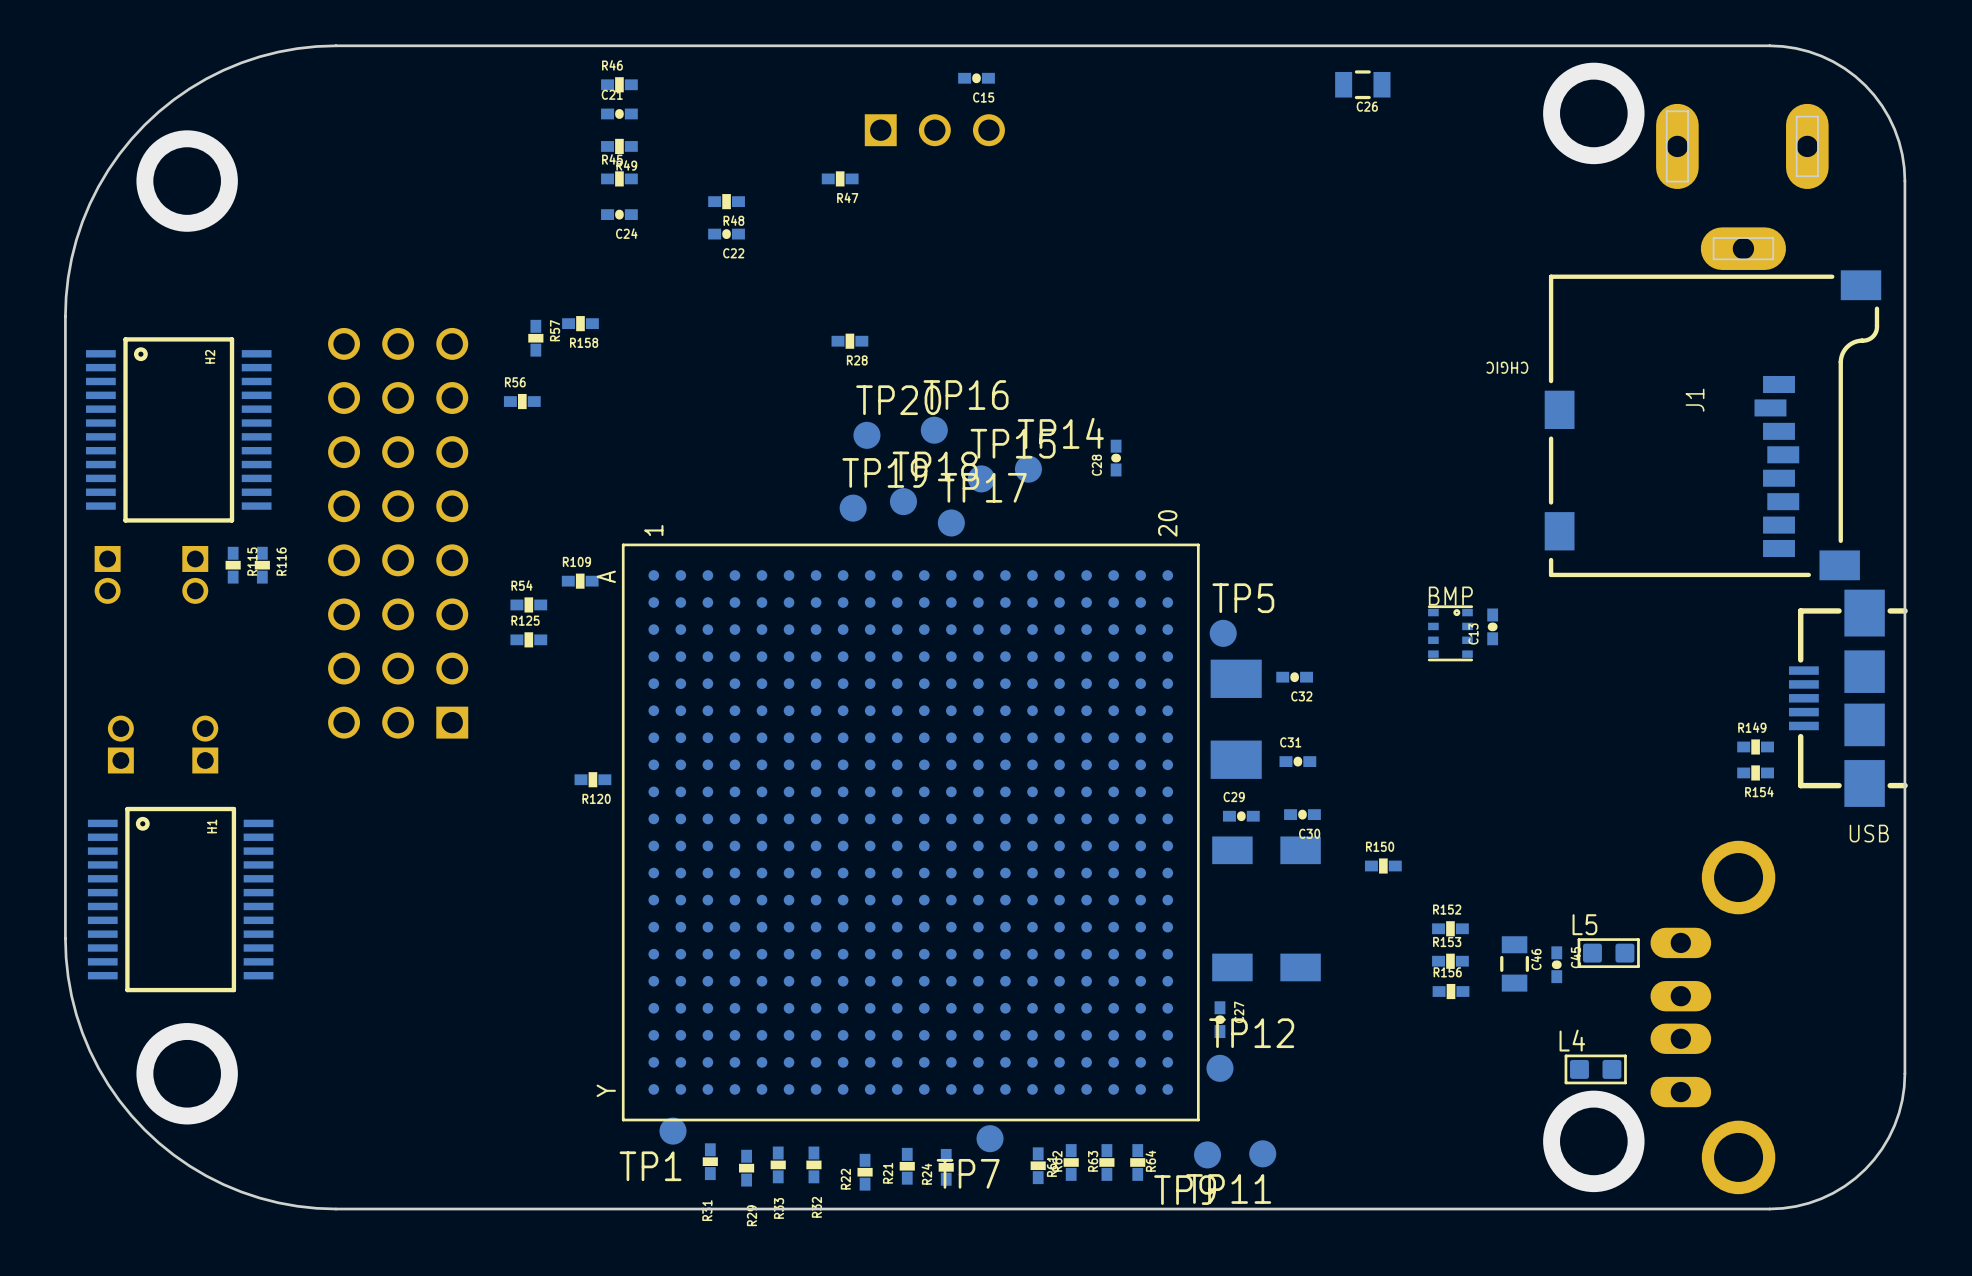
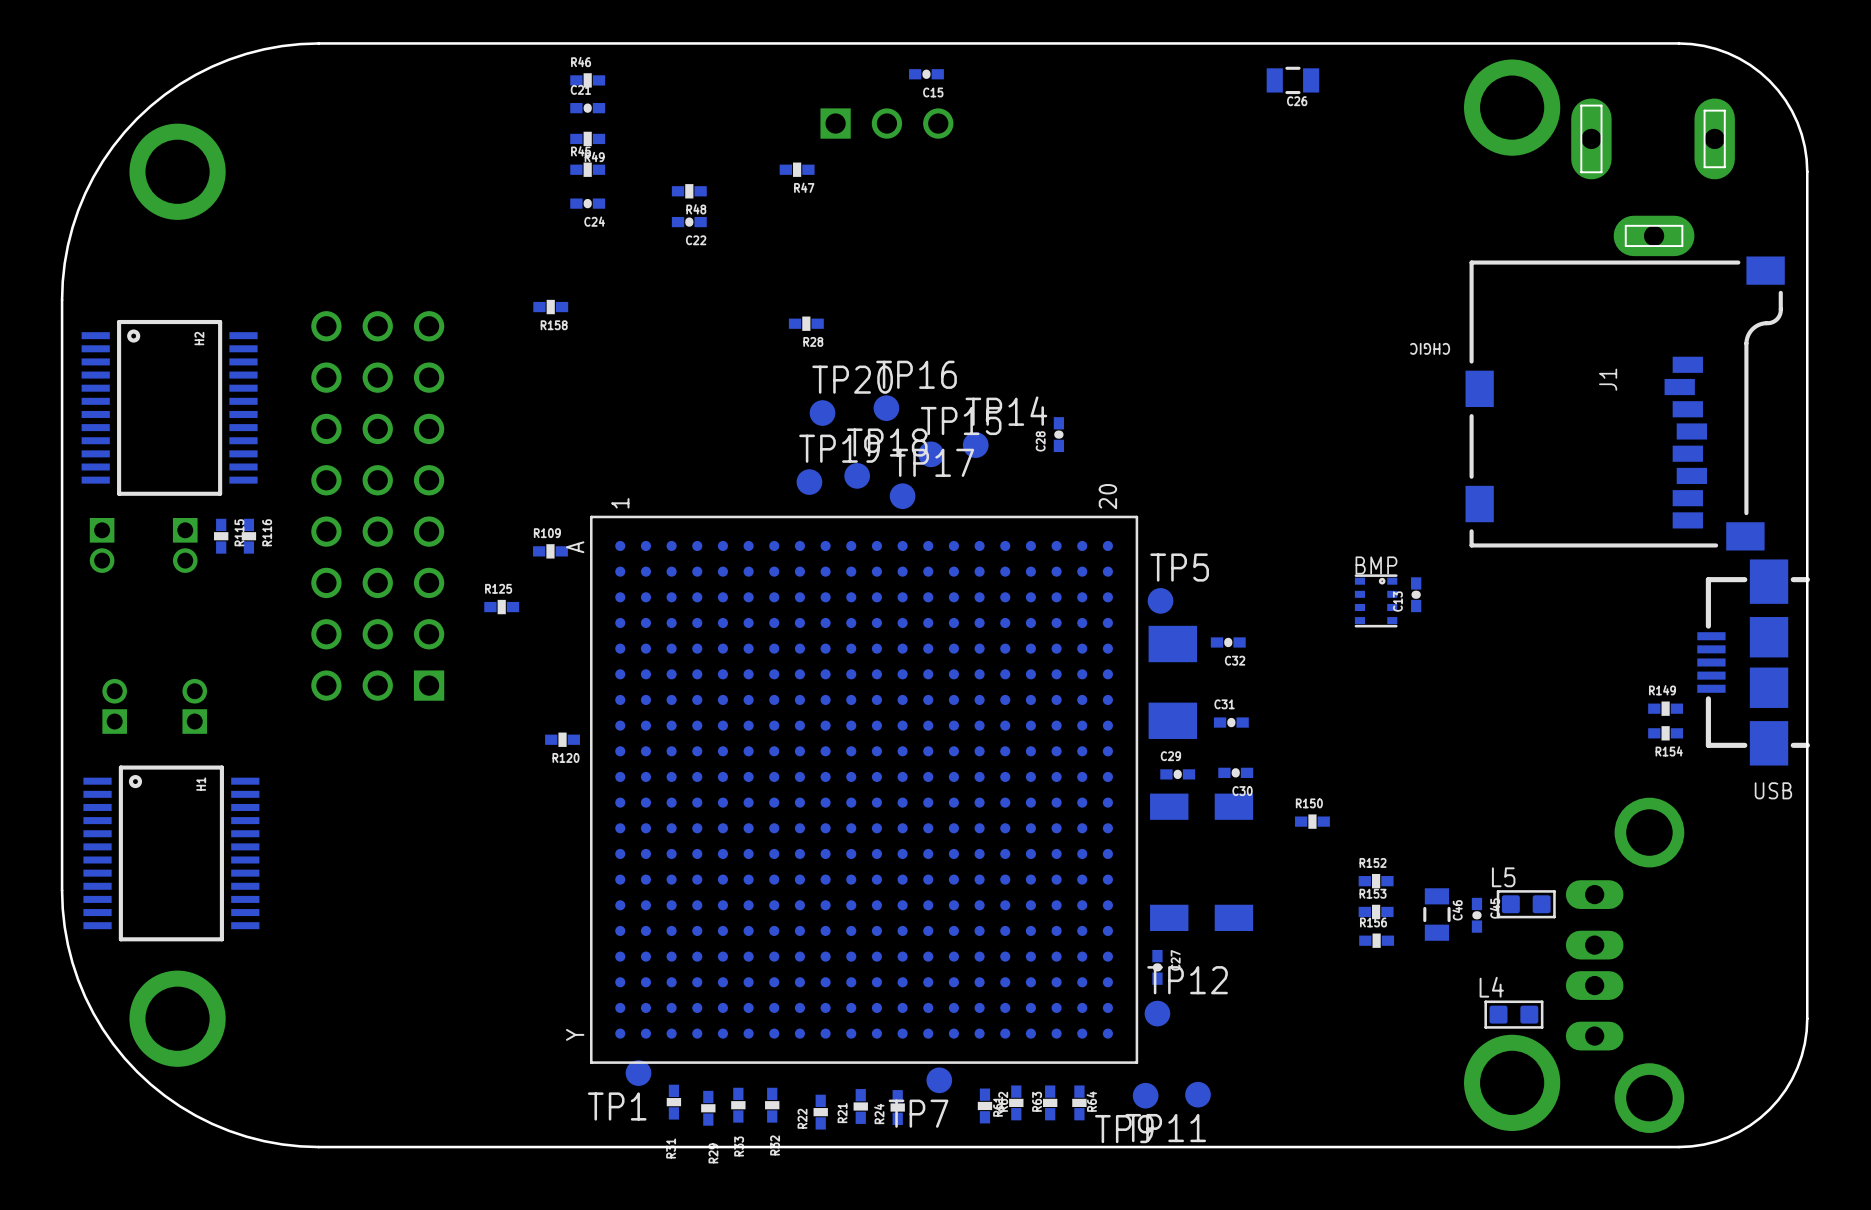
R57: (535, 338) -> none
R56: (522, 401) -> none
R54: (528, 604) -> none

